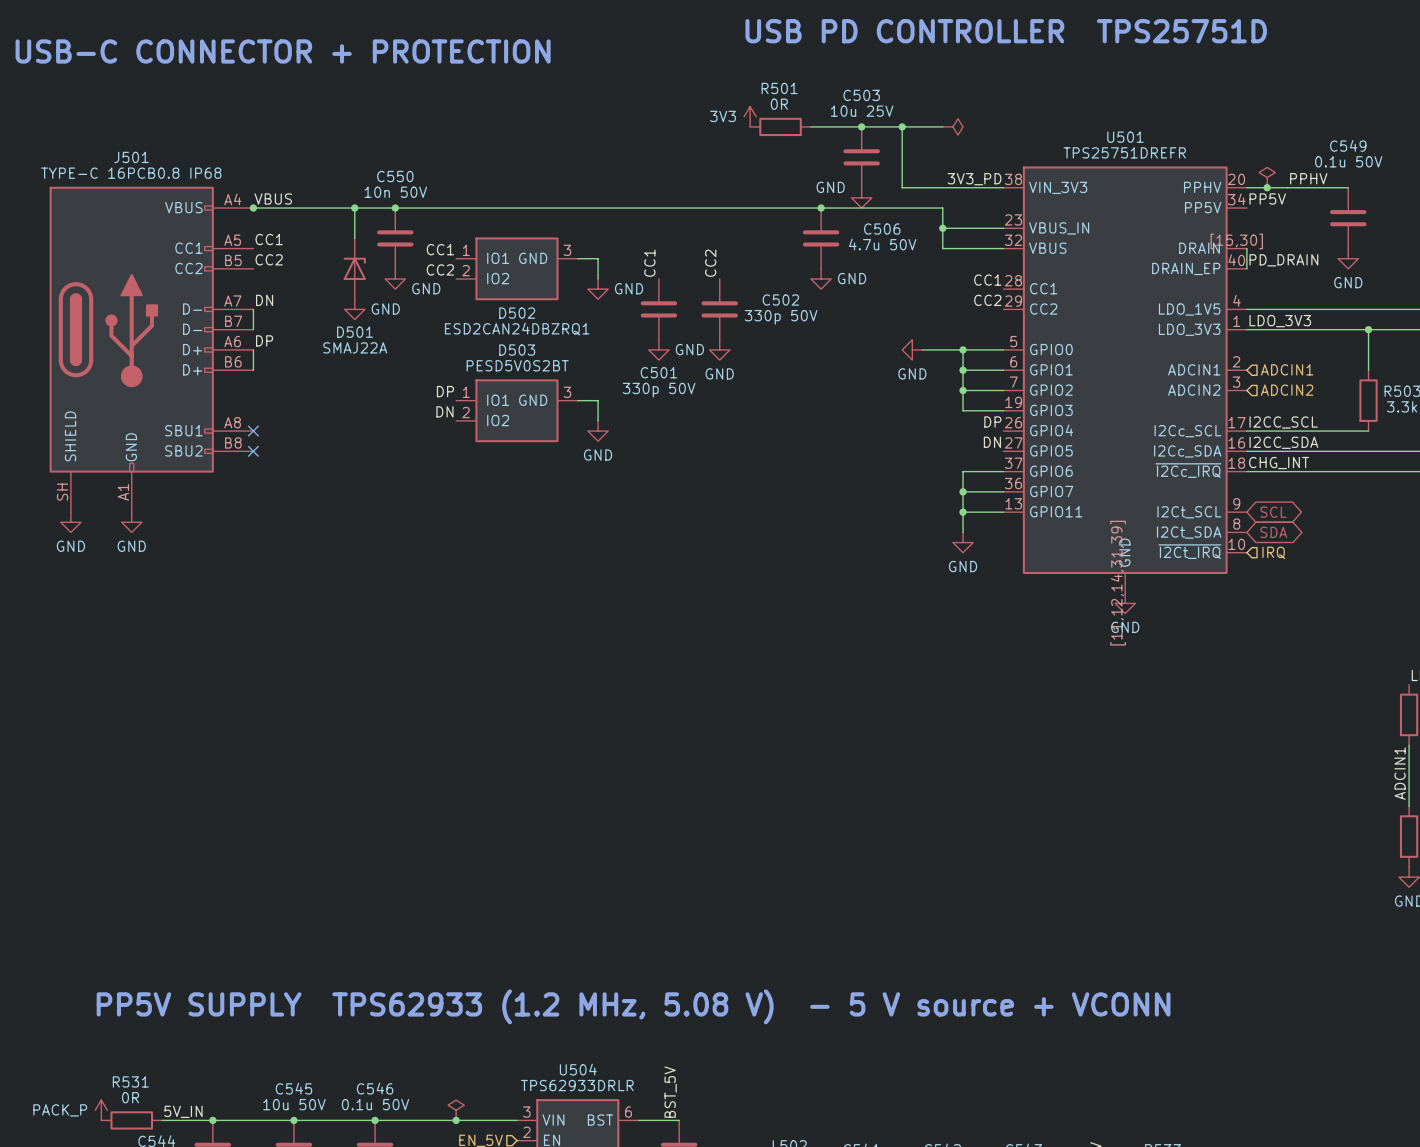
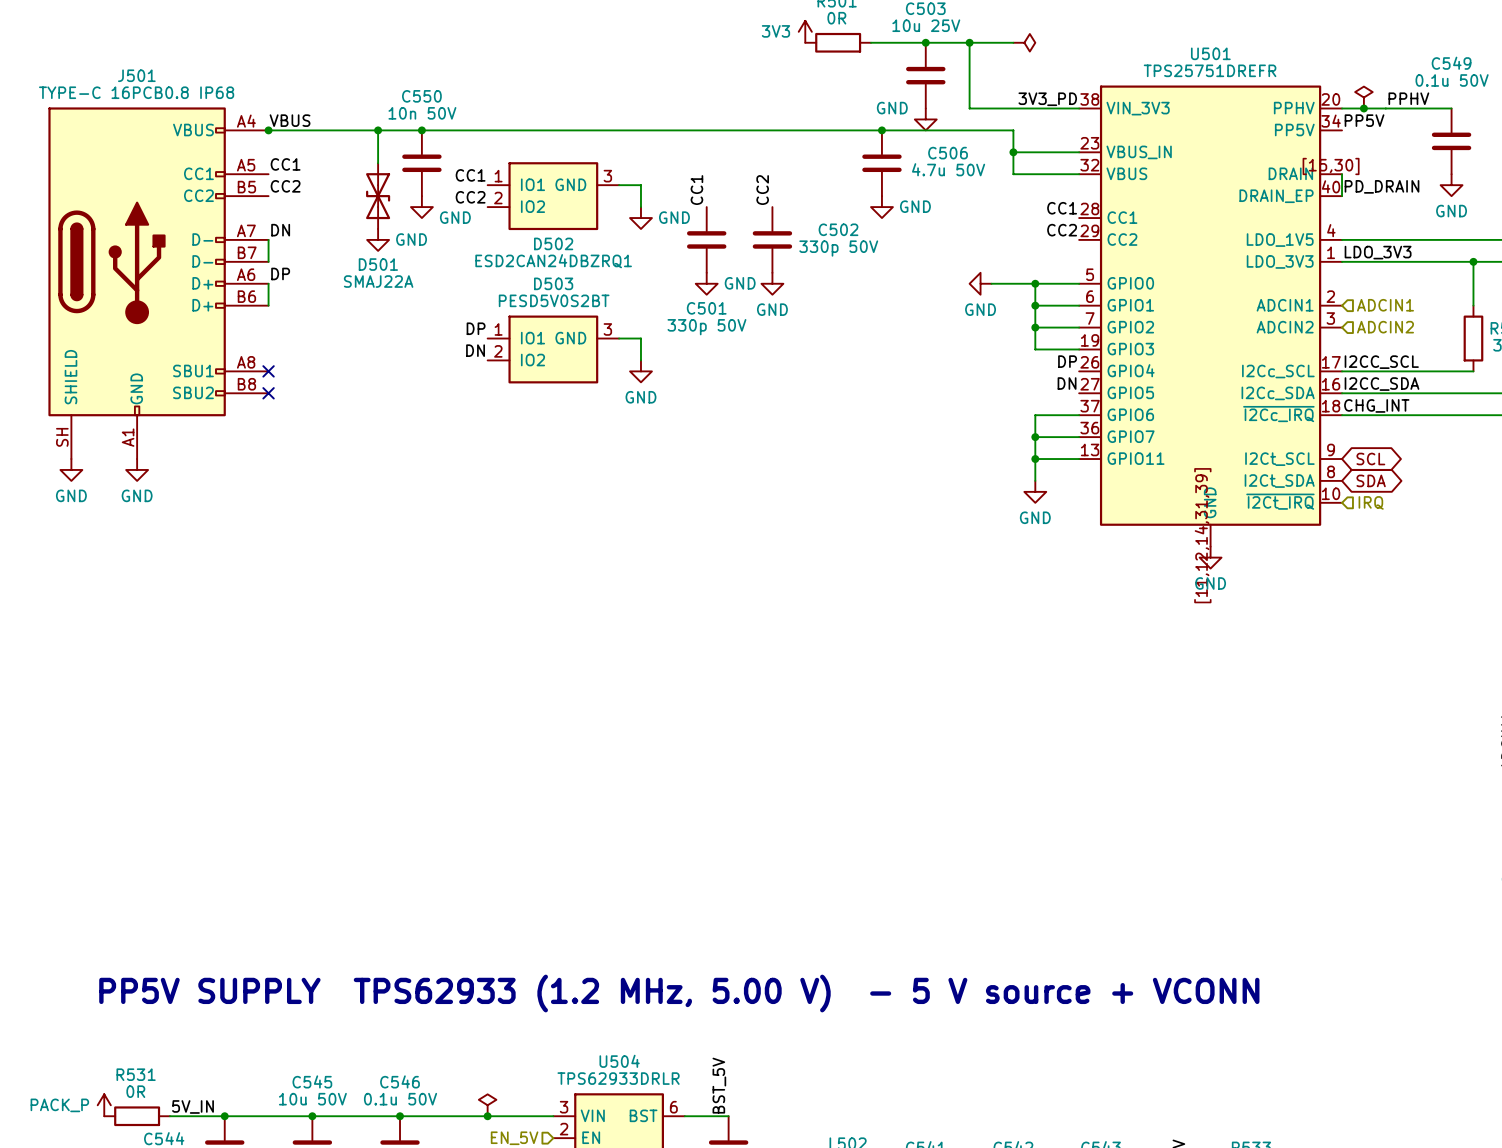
D501 symbol: [343, 238, 366, 300] -> [366, 163, 391, 229]
text: PP5V SUPPLY TPS62933 (1.2 MHz, 5.08 V) - 5 V source + VCONN (633, 1006) -> PP5V SUPPLY TPS62933 (1.2 MHz, 5.00 V) - 5 V source + VCONN (679, 993)

